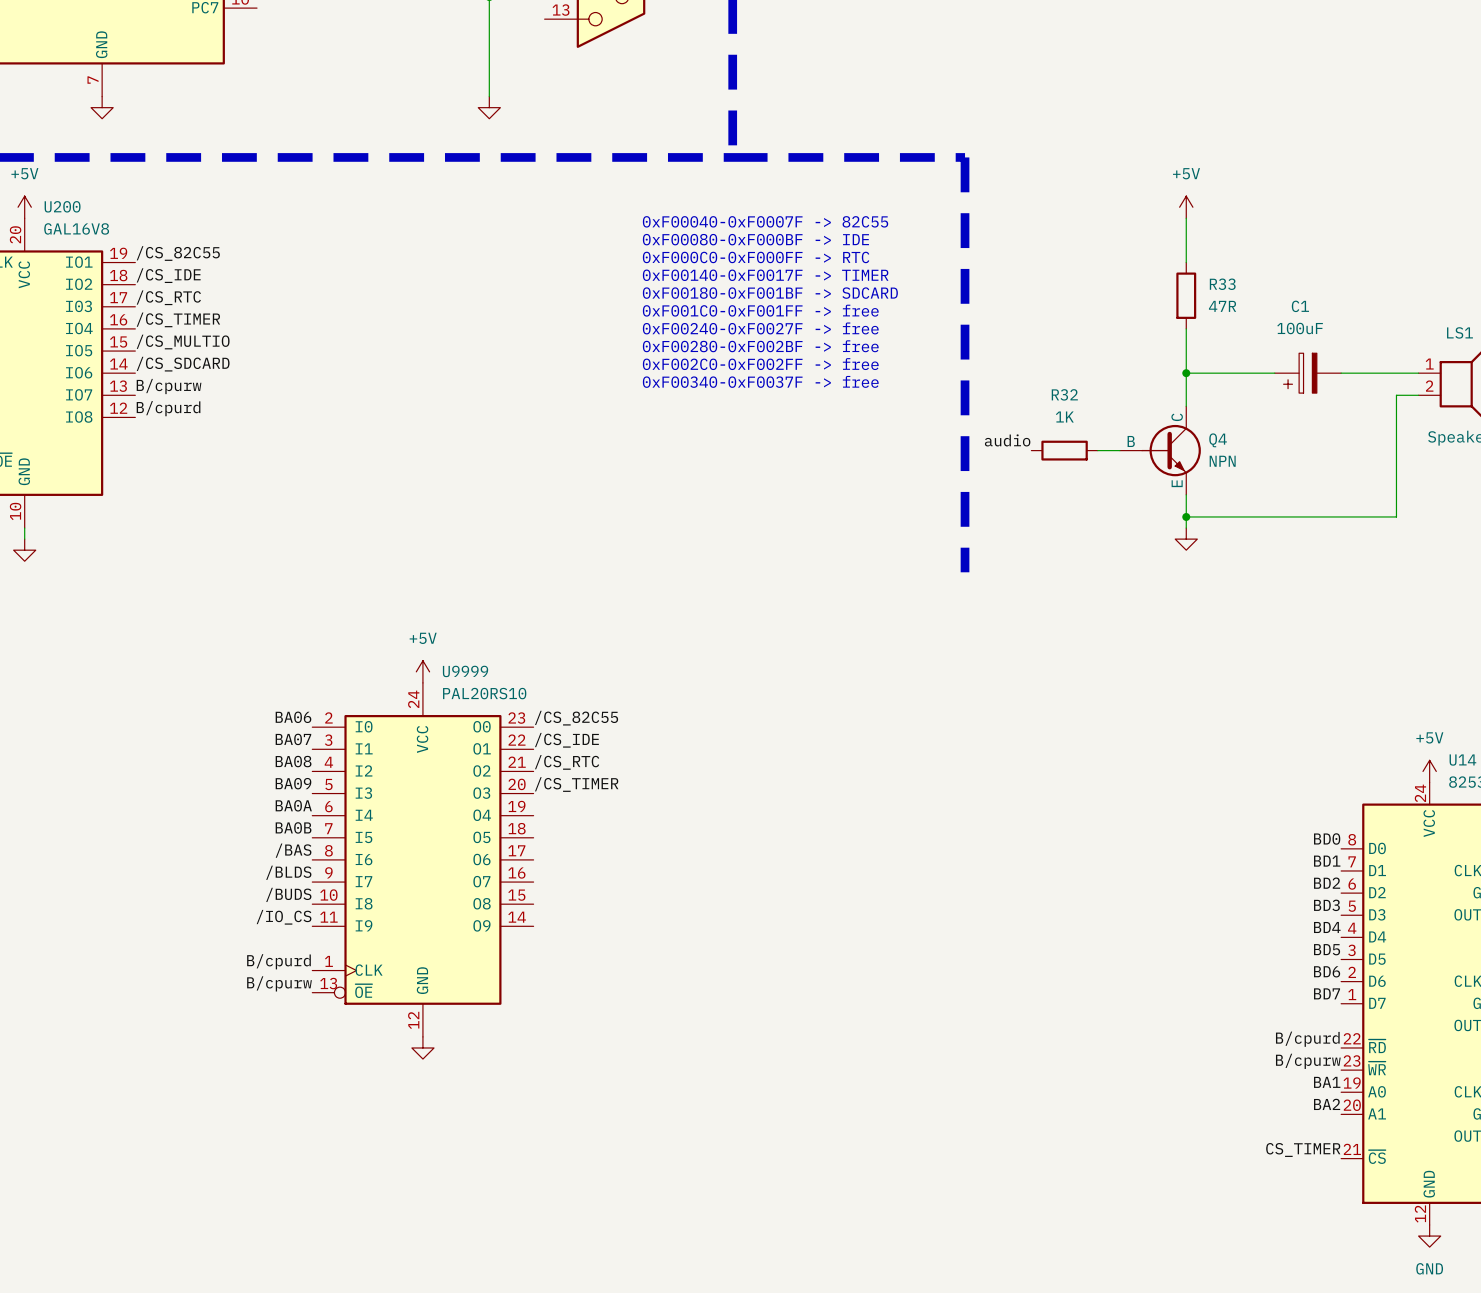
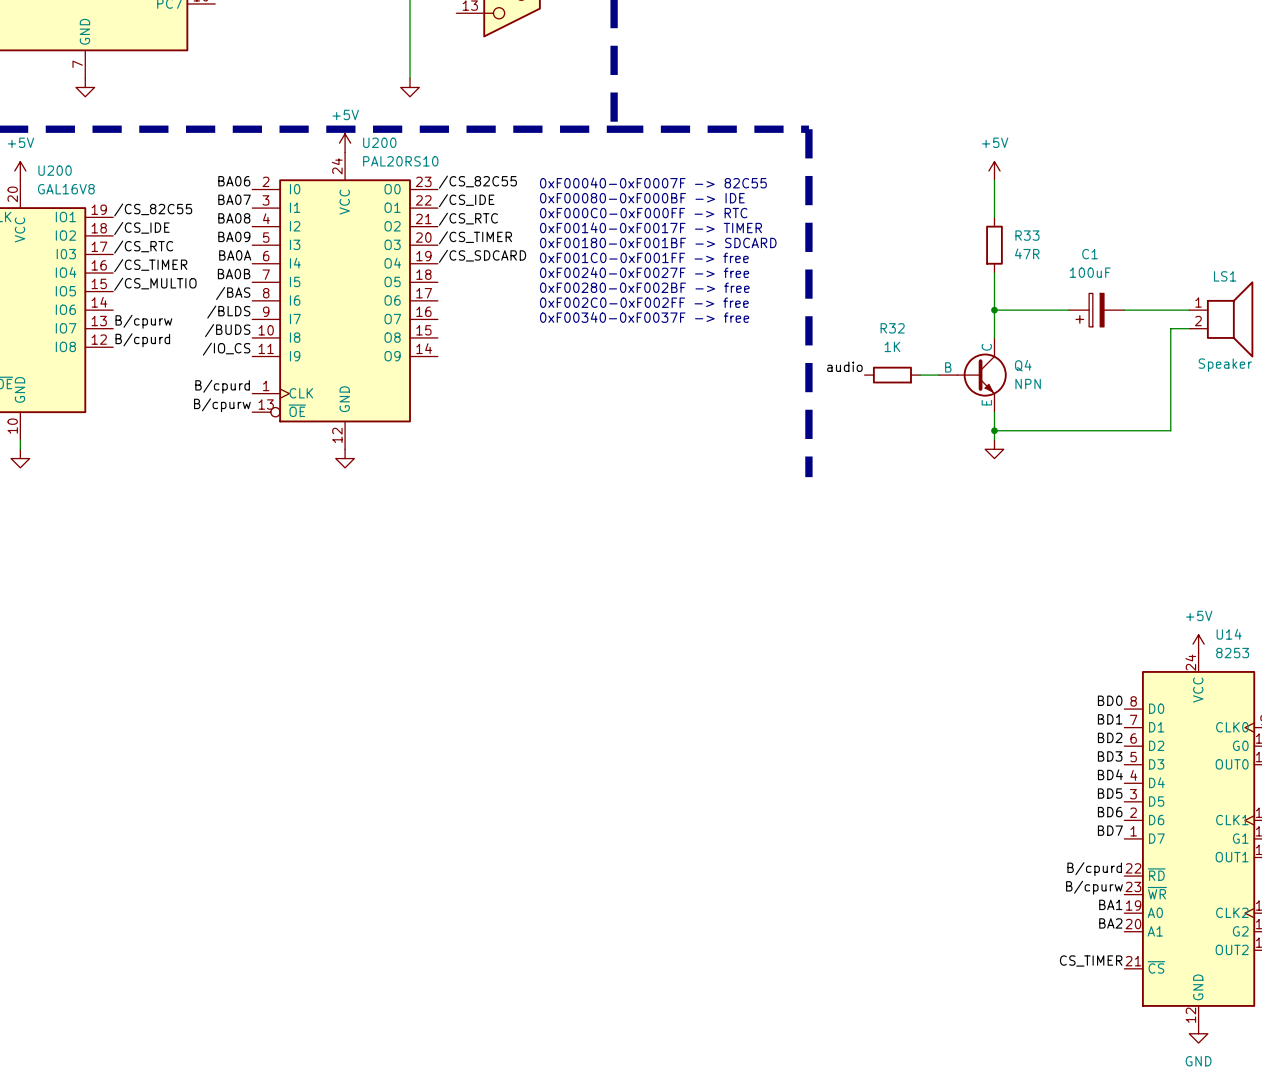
power symbol: none -> +5V (345, 143)
label: none -> BA06 (234, 181)
label: none -> /CS_82C55 (477, 182)
label: none -> BA07 (234, 199)
label: none -> /CS_IDE (466, 200)
label: none -> BA08 (234, 218)
label: none -> /CS_RTC (468, 219)
label: none -> BA09 (234, 236)
label: none -> /CS_TIMER (475, 237)
label: none -> BA0A (235, 255)
label: none -> /CS_SDCARD (482, 256)
label: none -> BA0B (234, 274)
label: none -> /BAS (233, 293)
U200: none -> PAL20RS10 (345, 300)
label: /CS_SDCARD (183, 364) -> none
label: none -> /BLDS (228, 312)
label: none -> /BUDS (227, 330)
label: none -> /IO_CS (226, 349)
label: none -> B/cpurd (222, 386)
label: none -> B/cpurw (222, 405)
power symbol: none -> (345, 458)
power symbol: +5V (422, 671) -> none
label: BA06 (293, 717) -> none
label: /CS_82C55 (576, 718) -> none
label: BA07 (293, 739) -> none
label: /CS_IDE (566, 740) -> none
label: BA08 (293, 761) -> none
label: /CS_RTC (567, 762) -> none
label: BA09 (293, 783) -> none
label: /CS_TIMER (576, 784) -> none
label: BA0A (293, 805) -> none
label: BA0B (293, 827) -> none
label: /BAS (293, 850) -> none
U9999: PAL20RS10 (422, 859) -> none
label: /BLDS (288, 872) -> none
label: /BUDS (288, 894) -> none
label: /IO_CS (284, 917) -> none
label: B/cpurd (278, 961) -> none
label: B/cpurw (279, 983) -> none
power symbol: (422, 1047) -> none

